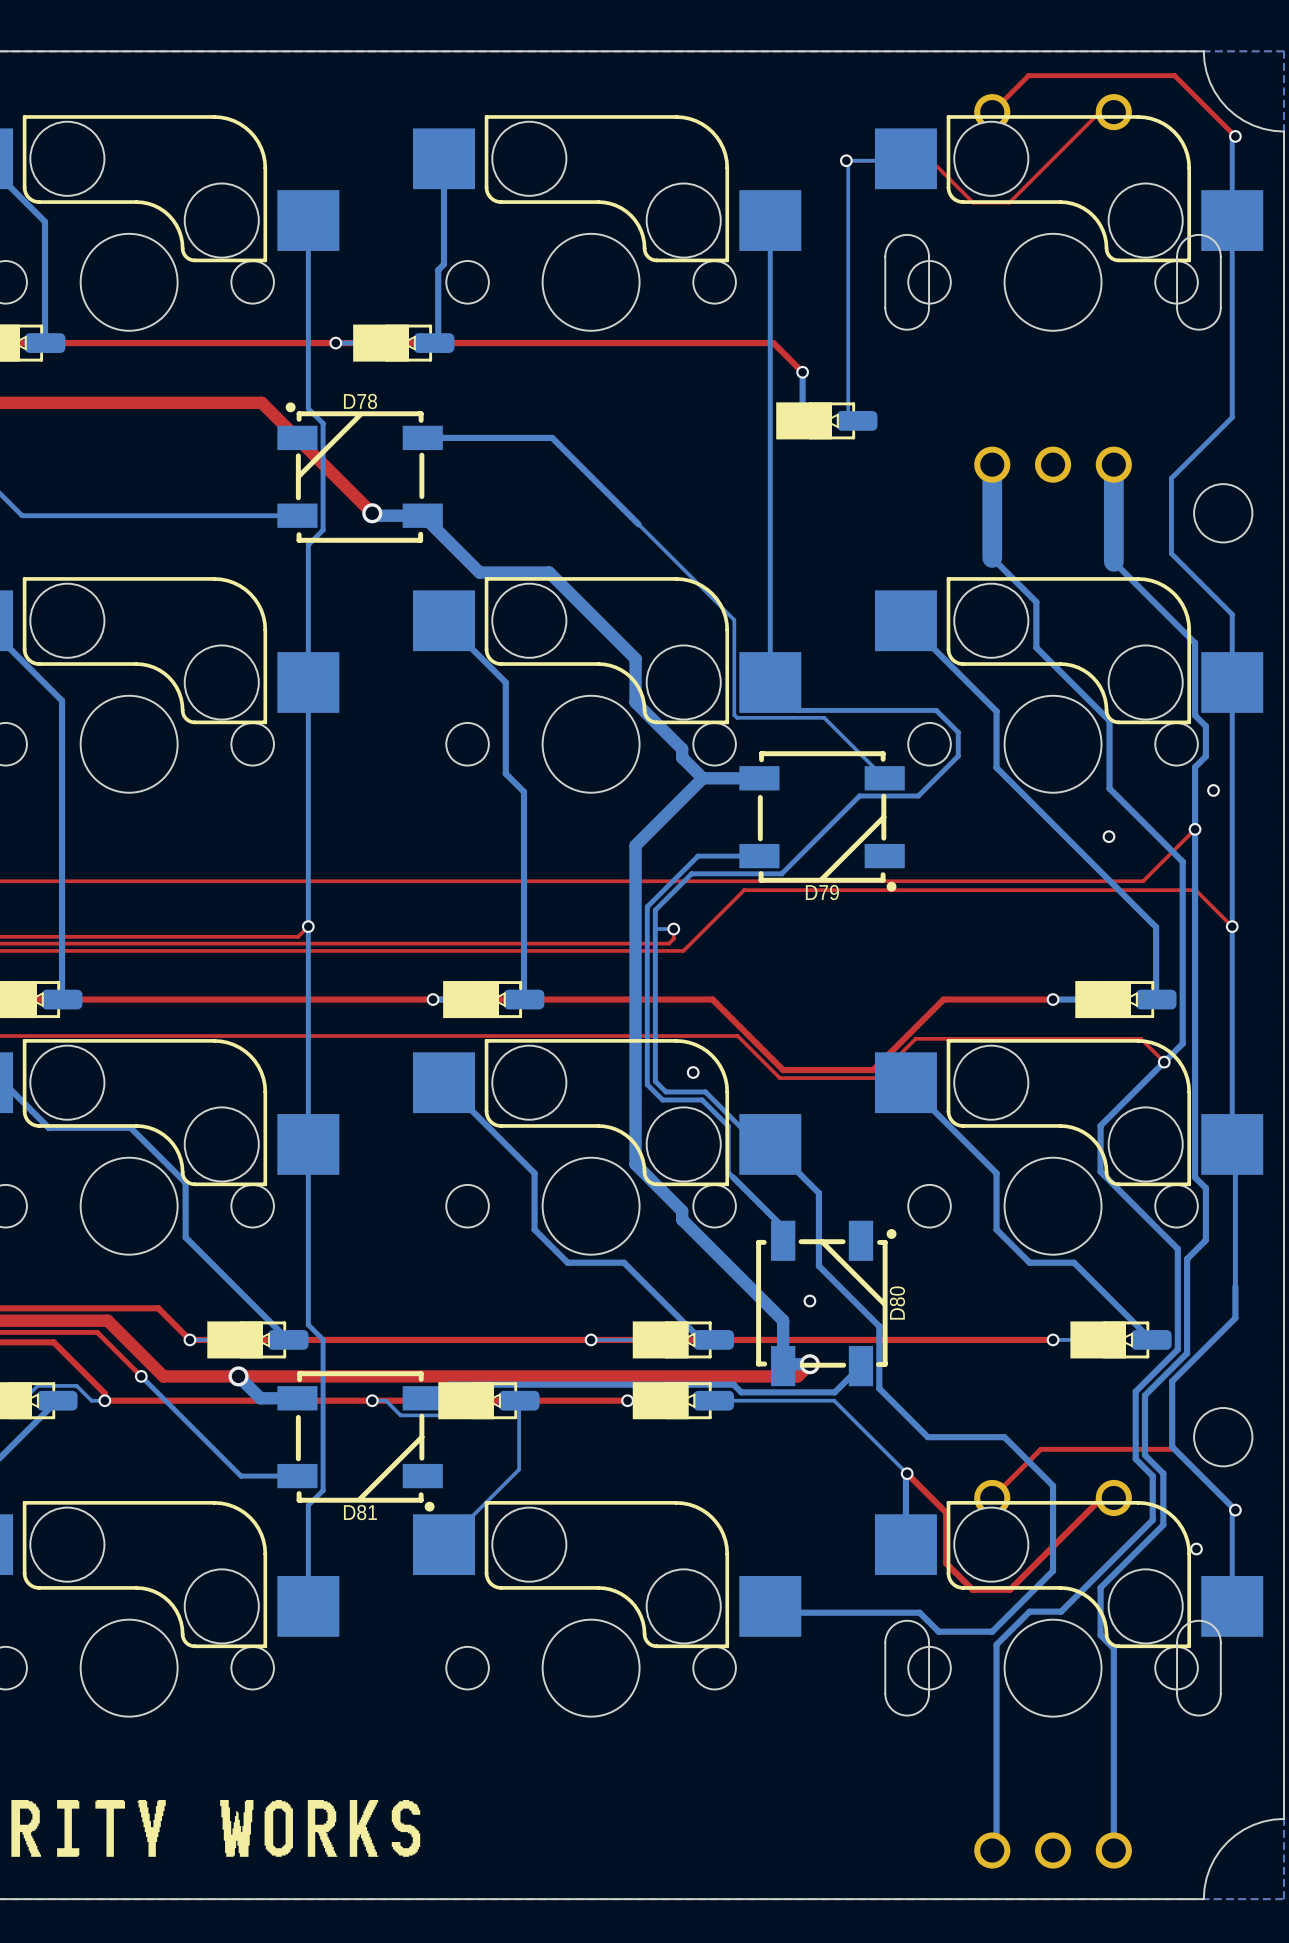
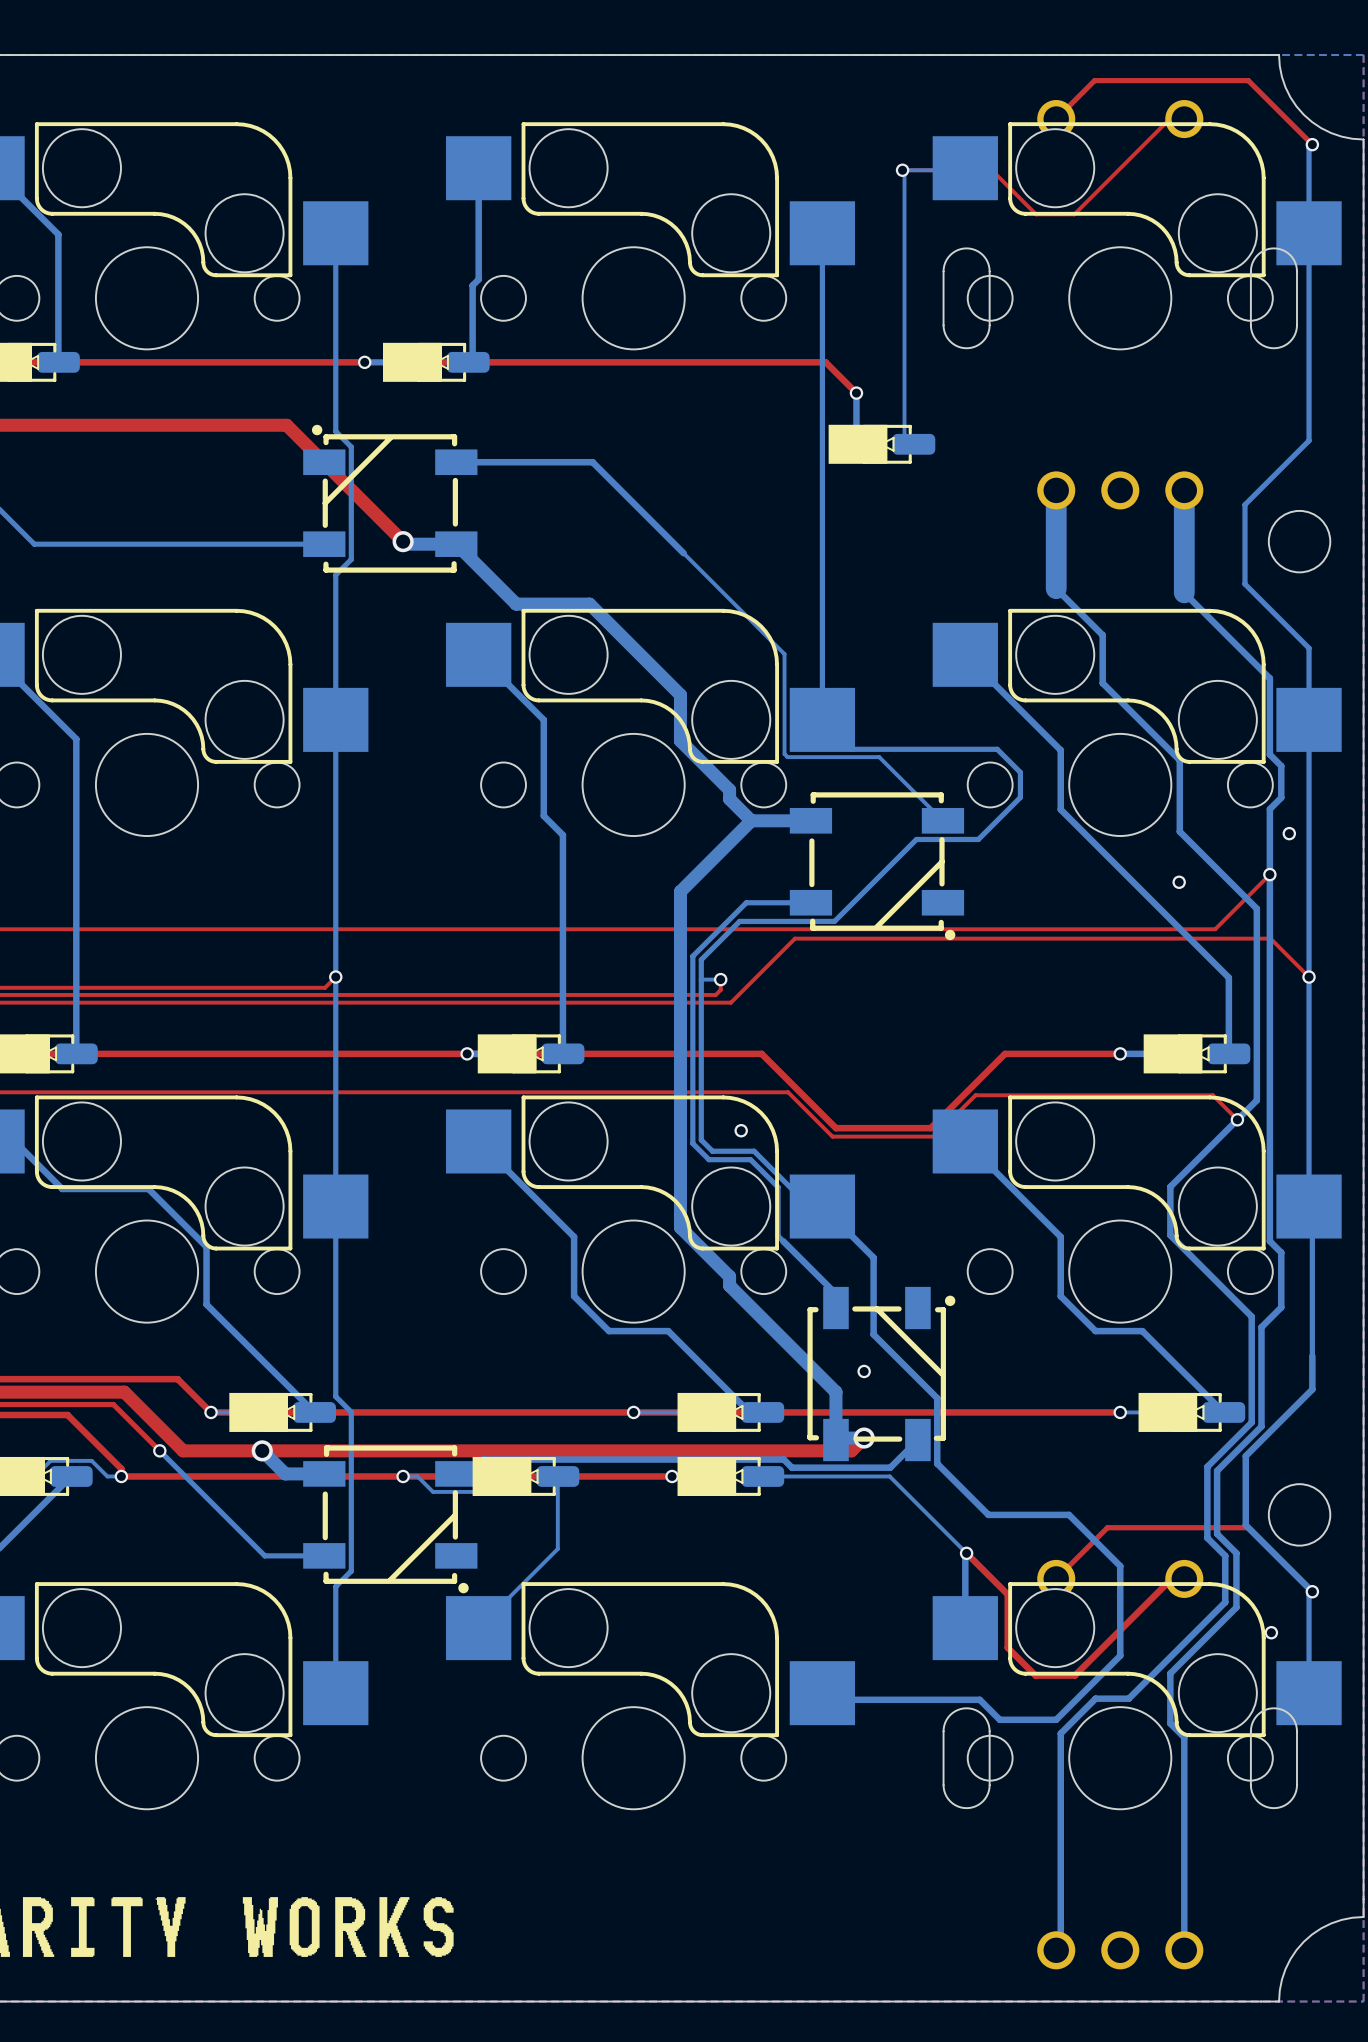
D78 name: D78 (360, 401) -> none
D79 name: D79 (822, 892) -> none
D80 name: D80 (897, 1303) -> none
D81 name: D81 (360, 1512) -> none

